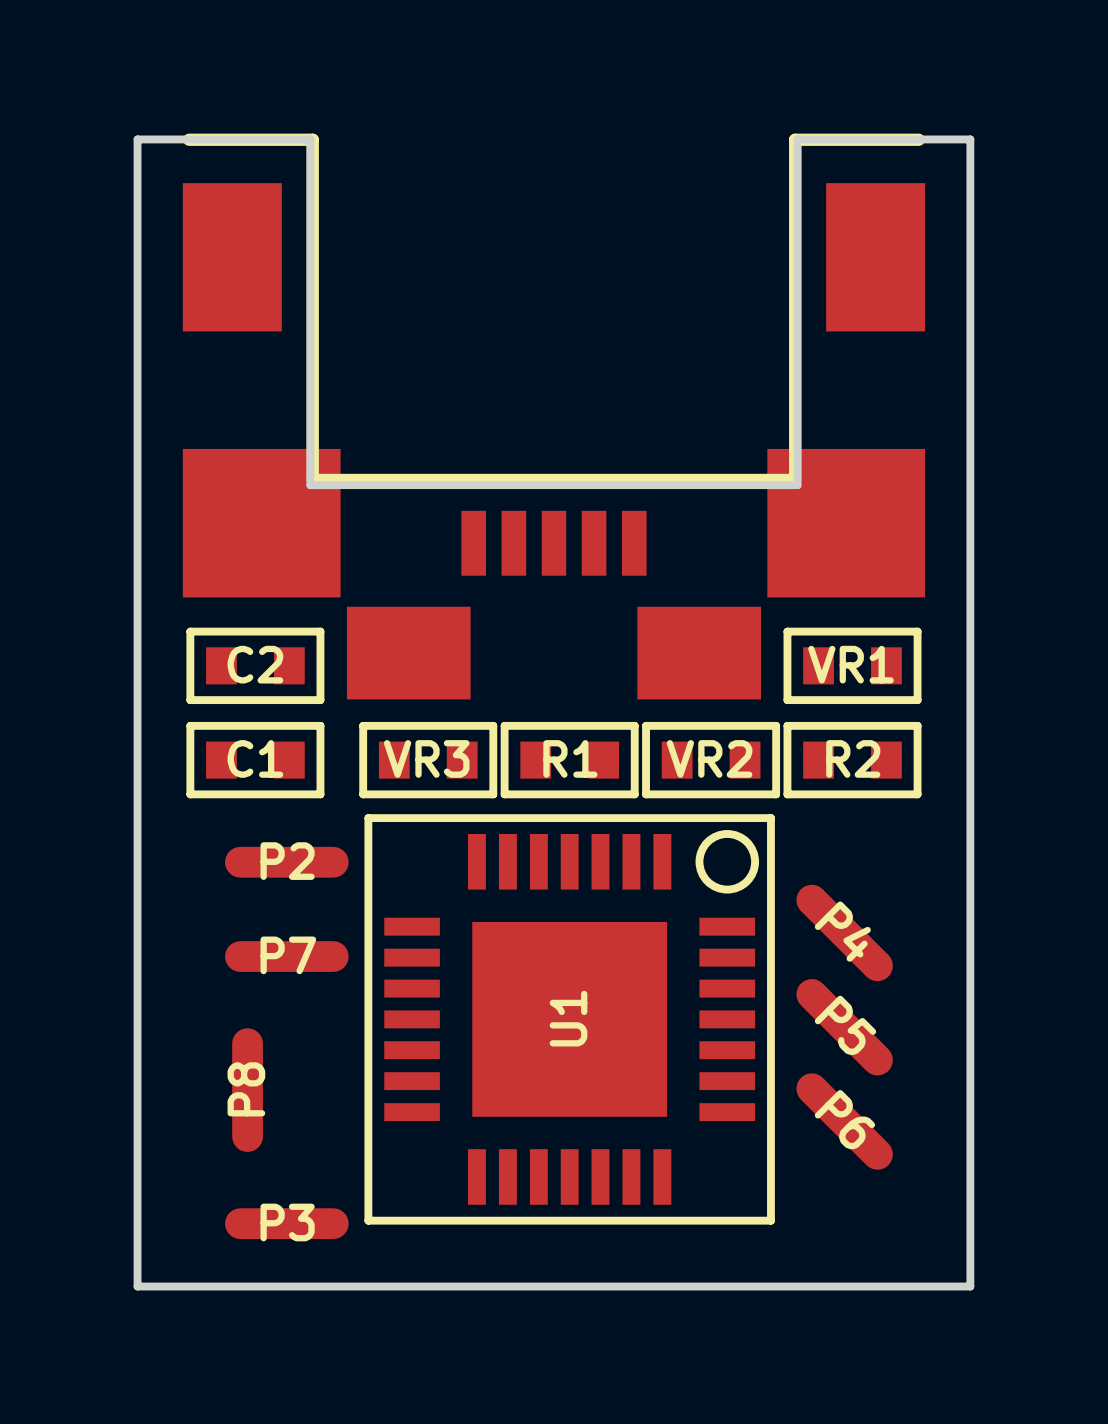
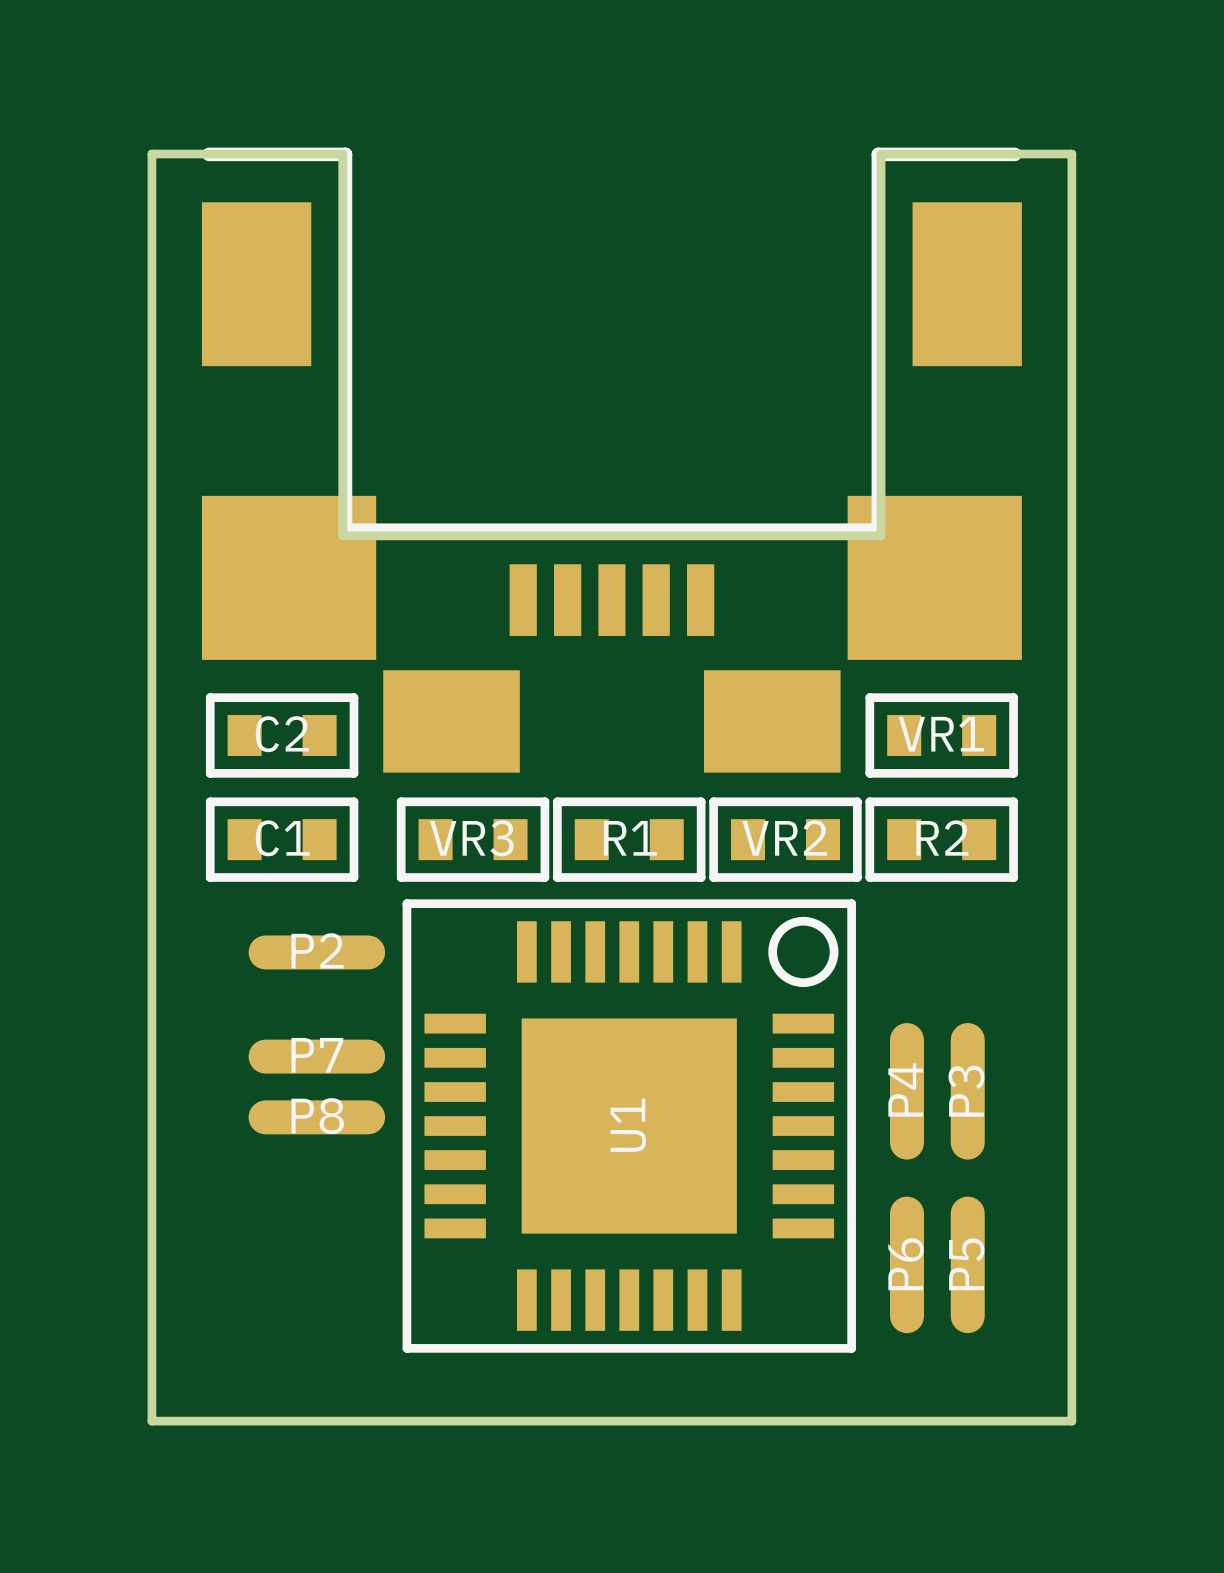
P4 rotation: 0° (844, 932) -> 45° clockwise (906, 1091)
P4 position: (844, 932) -> (906, 1091)
P5 rotation: 0° (844, 1027) -> 45° clockwise (967, 1264)
P5 position: (844, 1027) -> (967, 1264)
P8 rotation: 0° (247, 1090) -> 90° clockwise (316, 1117)
P8 position: (247, 1090) -> (316, 1117)
P6 rotation: 0° (844, 1121) -> 45° clockwise (906, 1264)
P3 rotation: 0° (286, 1223) -> 90° clockwise (967, 1091)
P3 position: (286, 1223) -> (967, 1091)

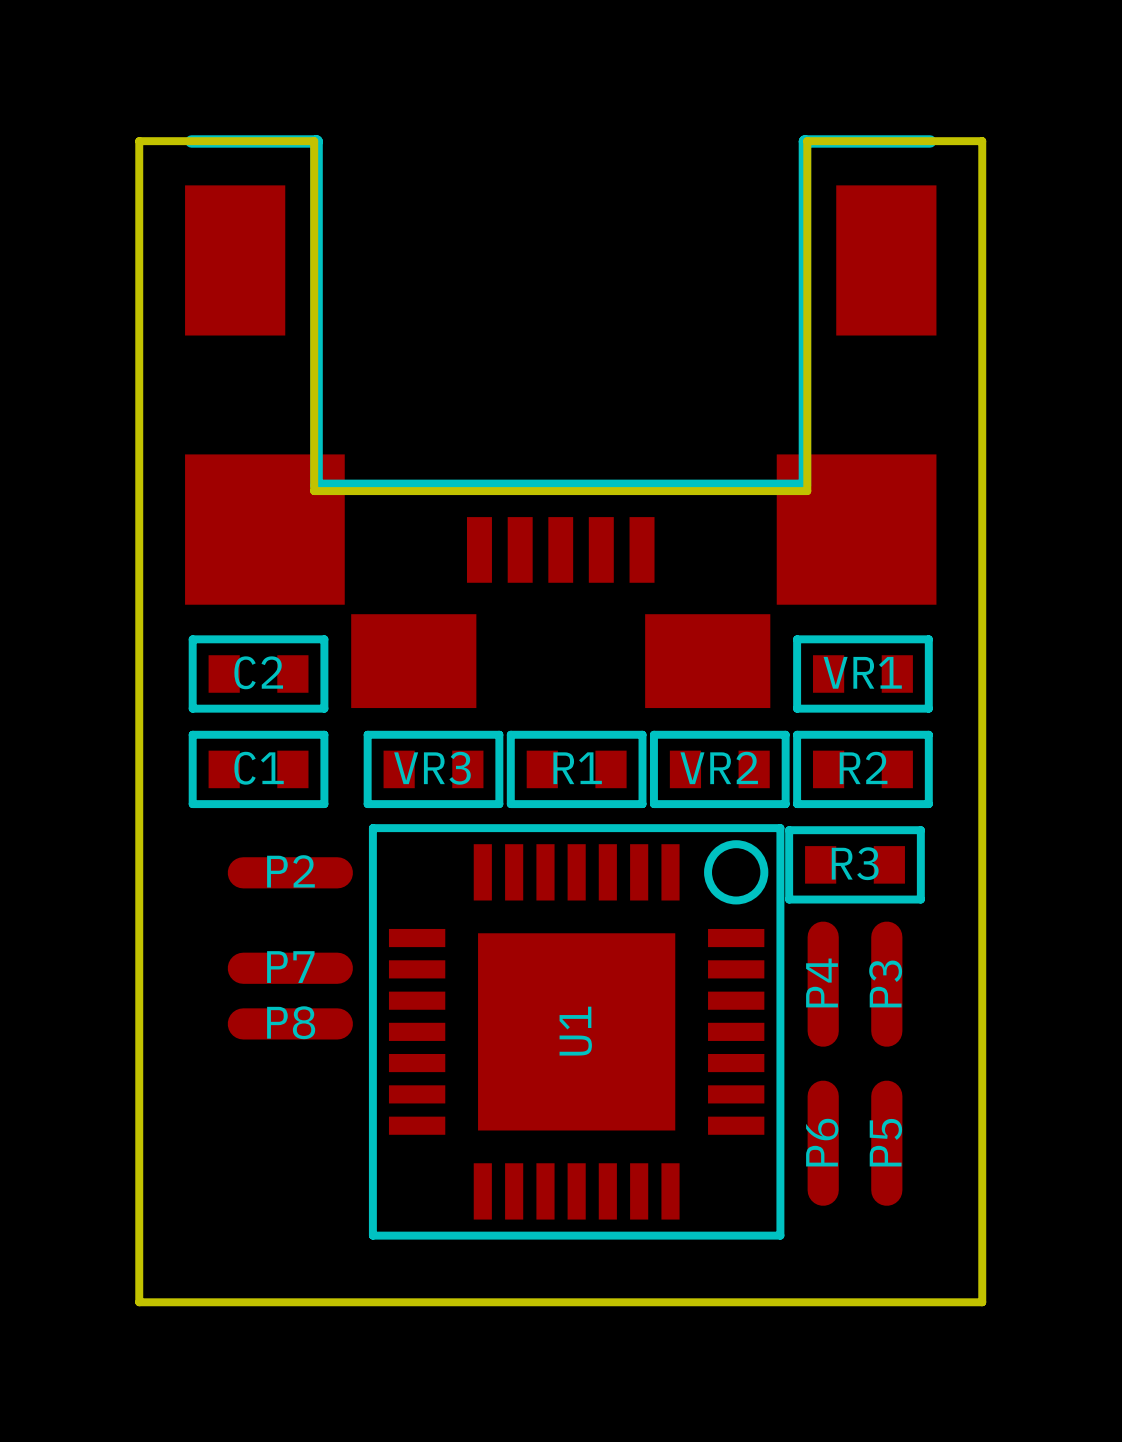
R3: none -> (855, 864)
P4 position: (906, 1091) -> (823, 984)
P3 position: (967, 1091) -> (886, 984)
P6 position: (906, 1264) -> (823, 1143)
P5 position: (967, 1264) -> (886, 1143)

